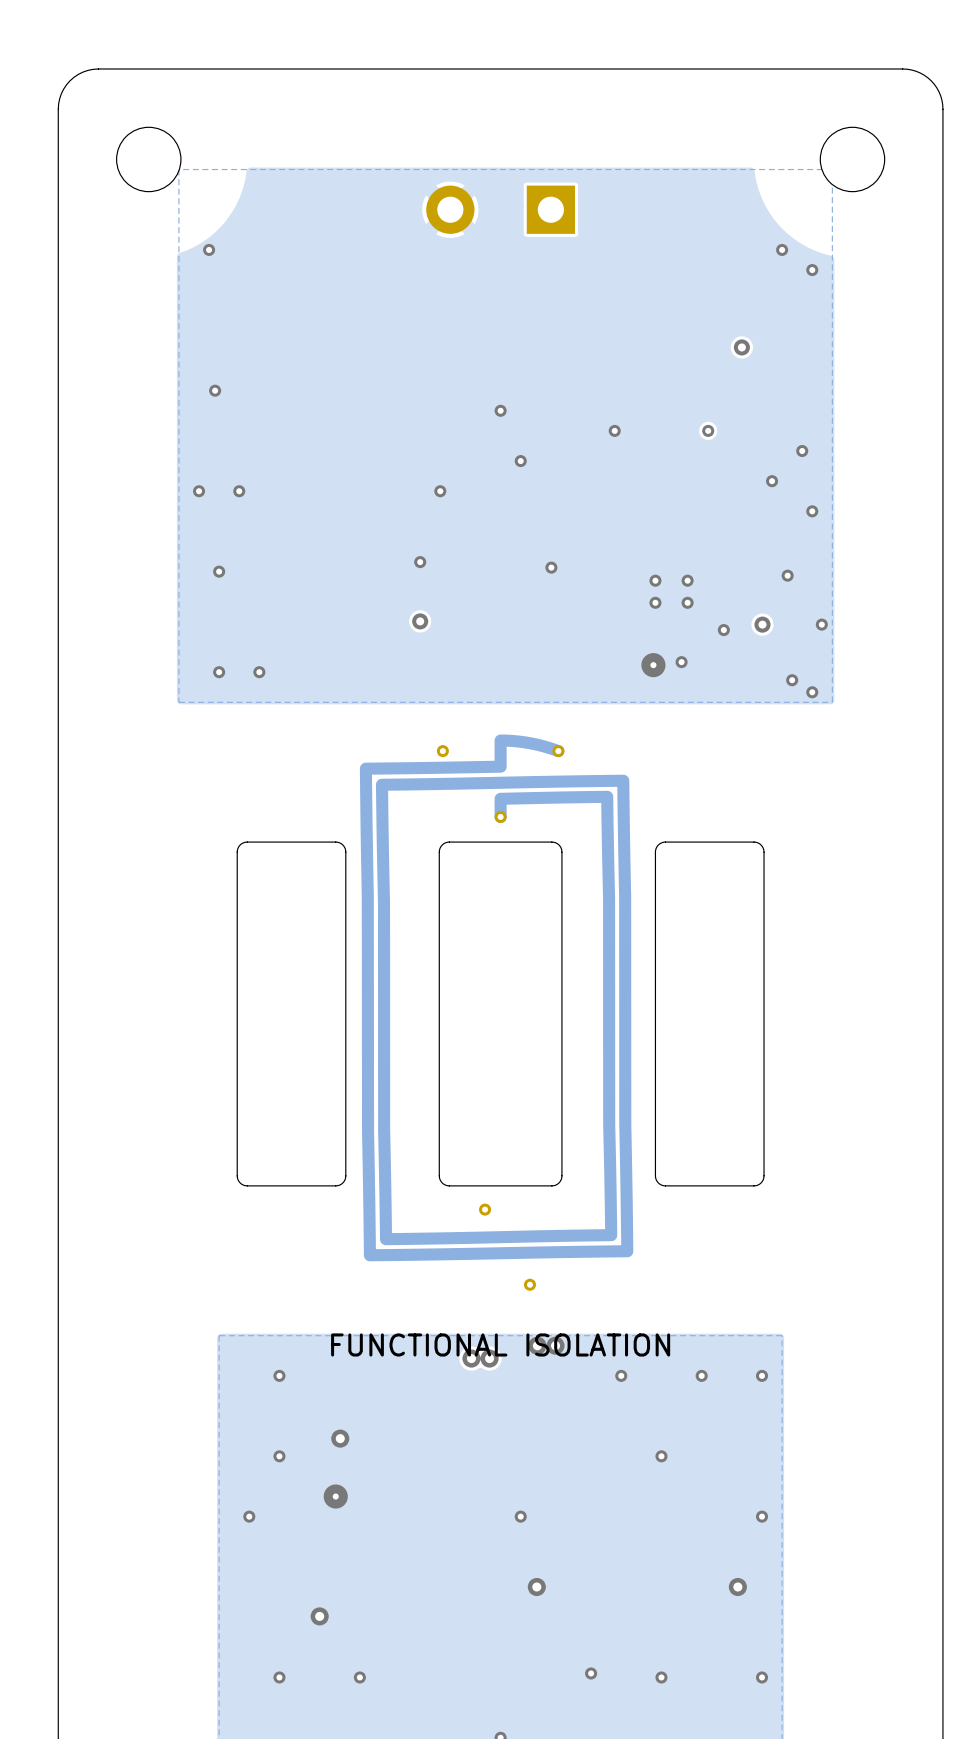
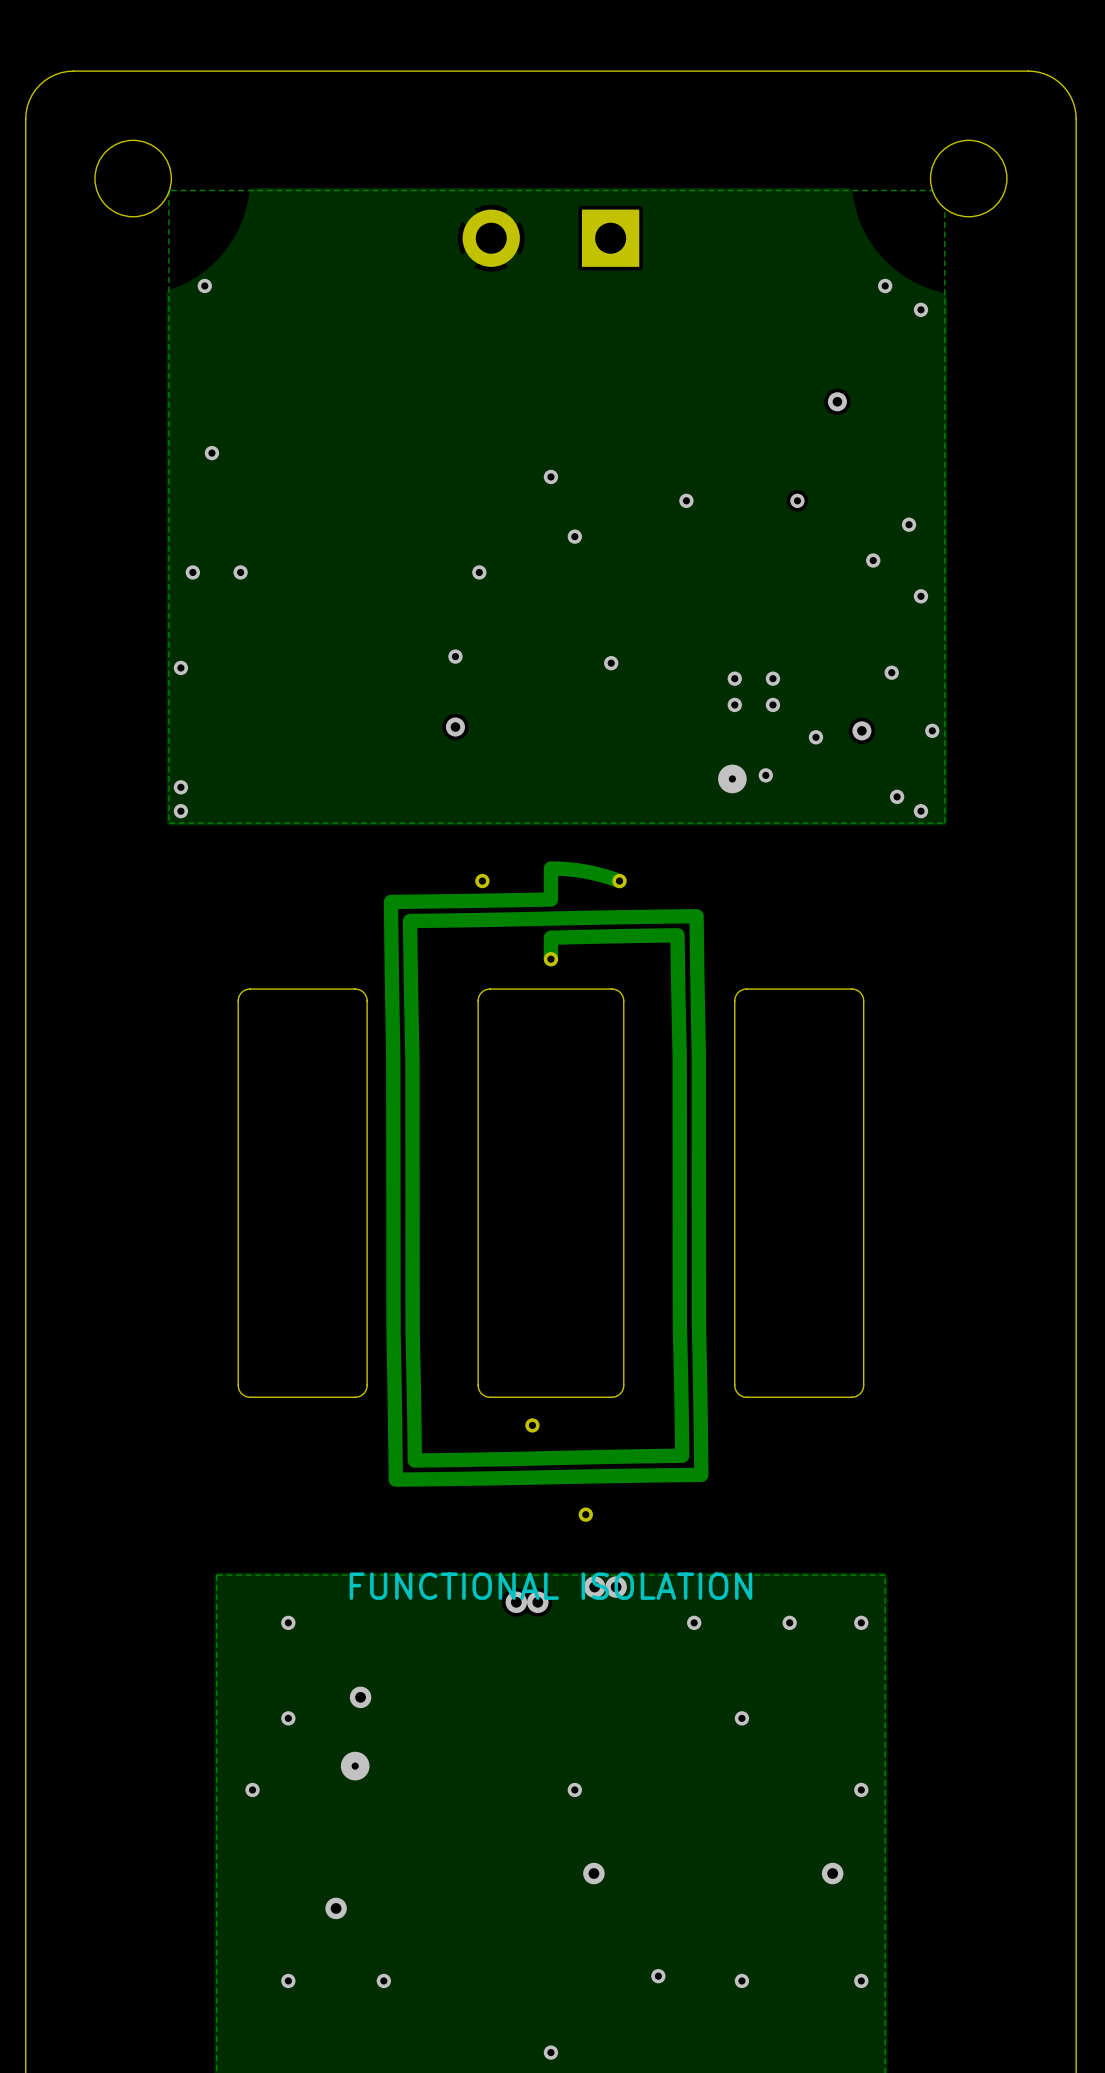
via position: (219, 571) -> (180, 667)
via: none -> (180, 787)
via: (219, 672) -> none
via: (259, 672) -> none
via: none -> (180, 811)

